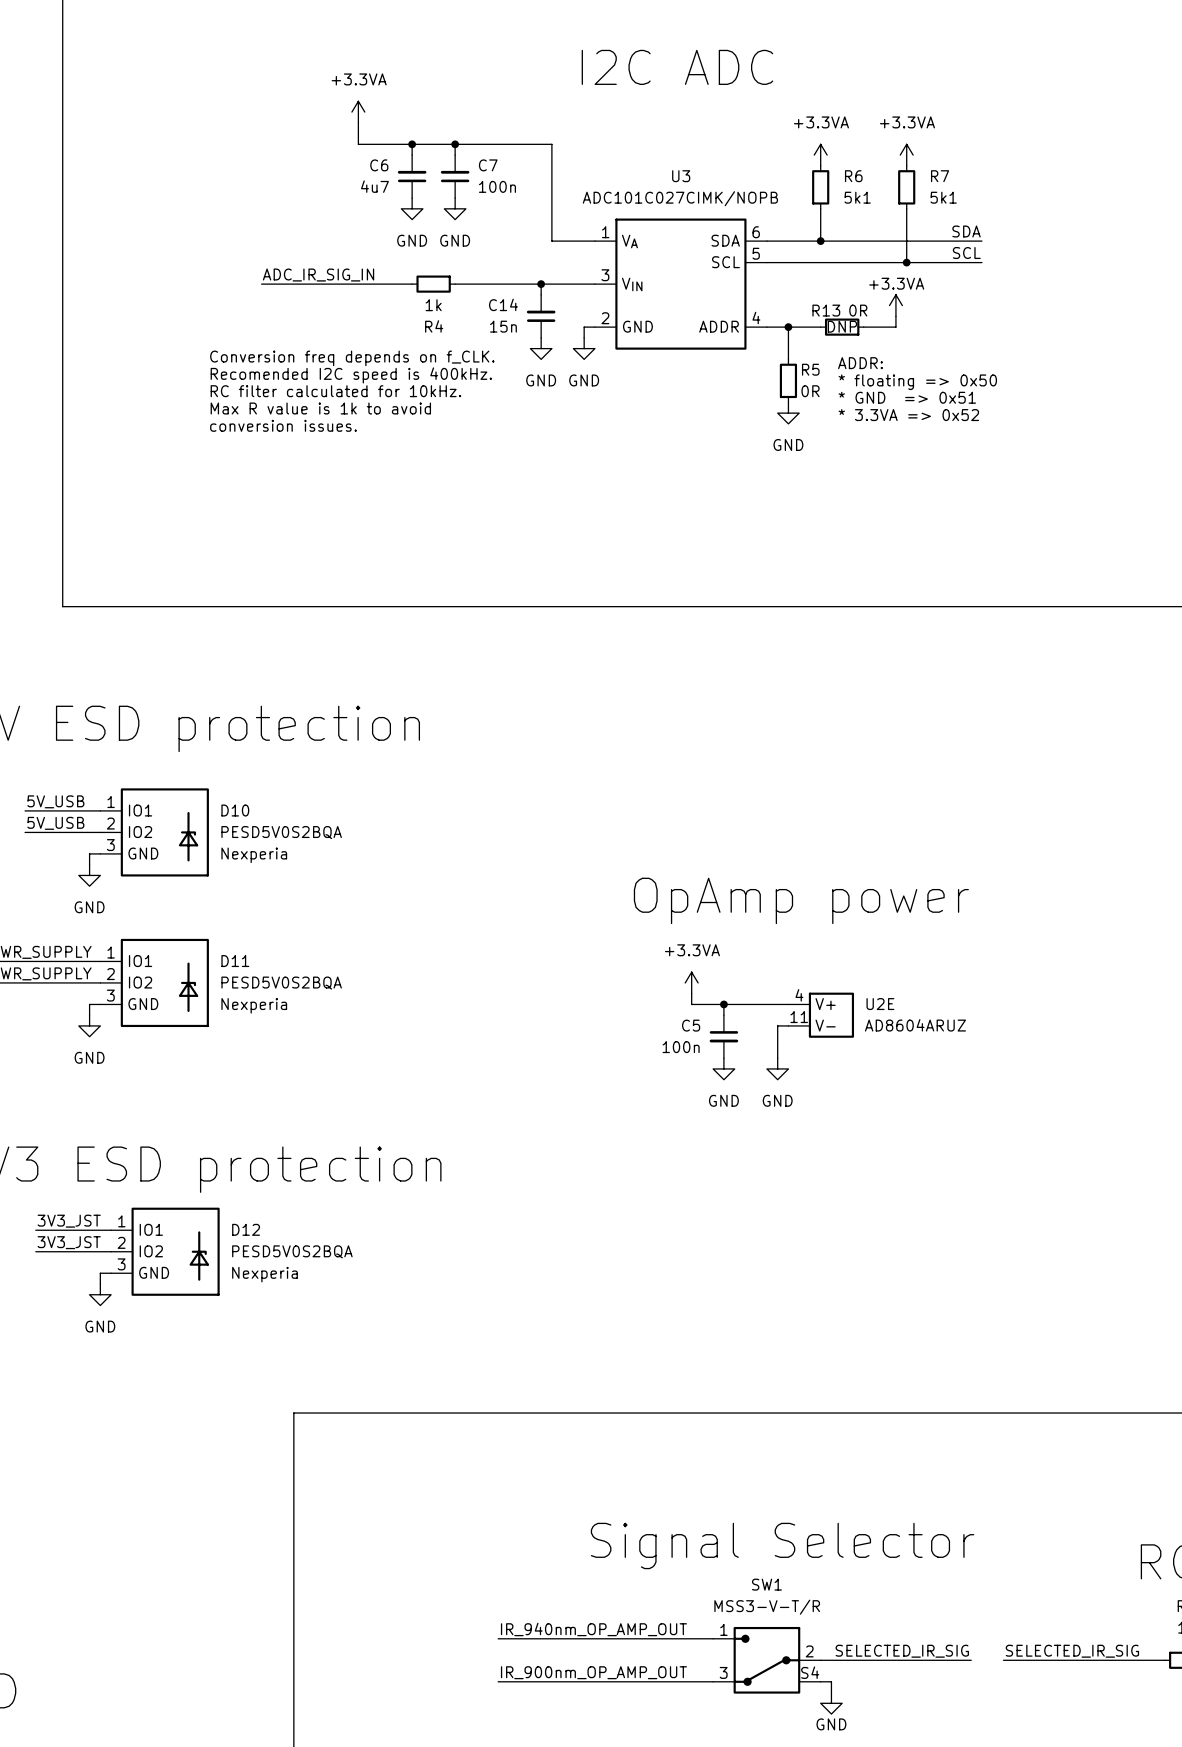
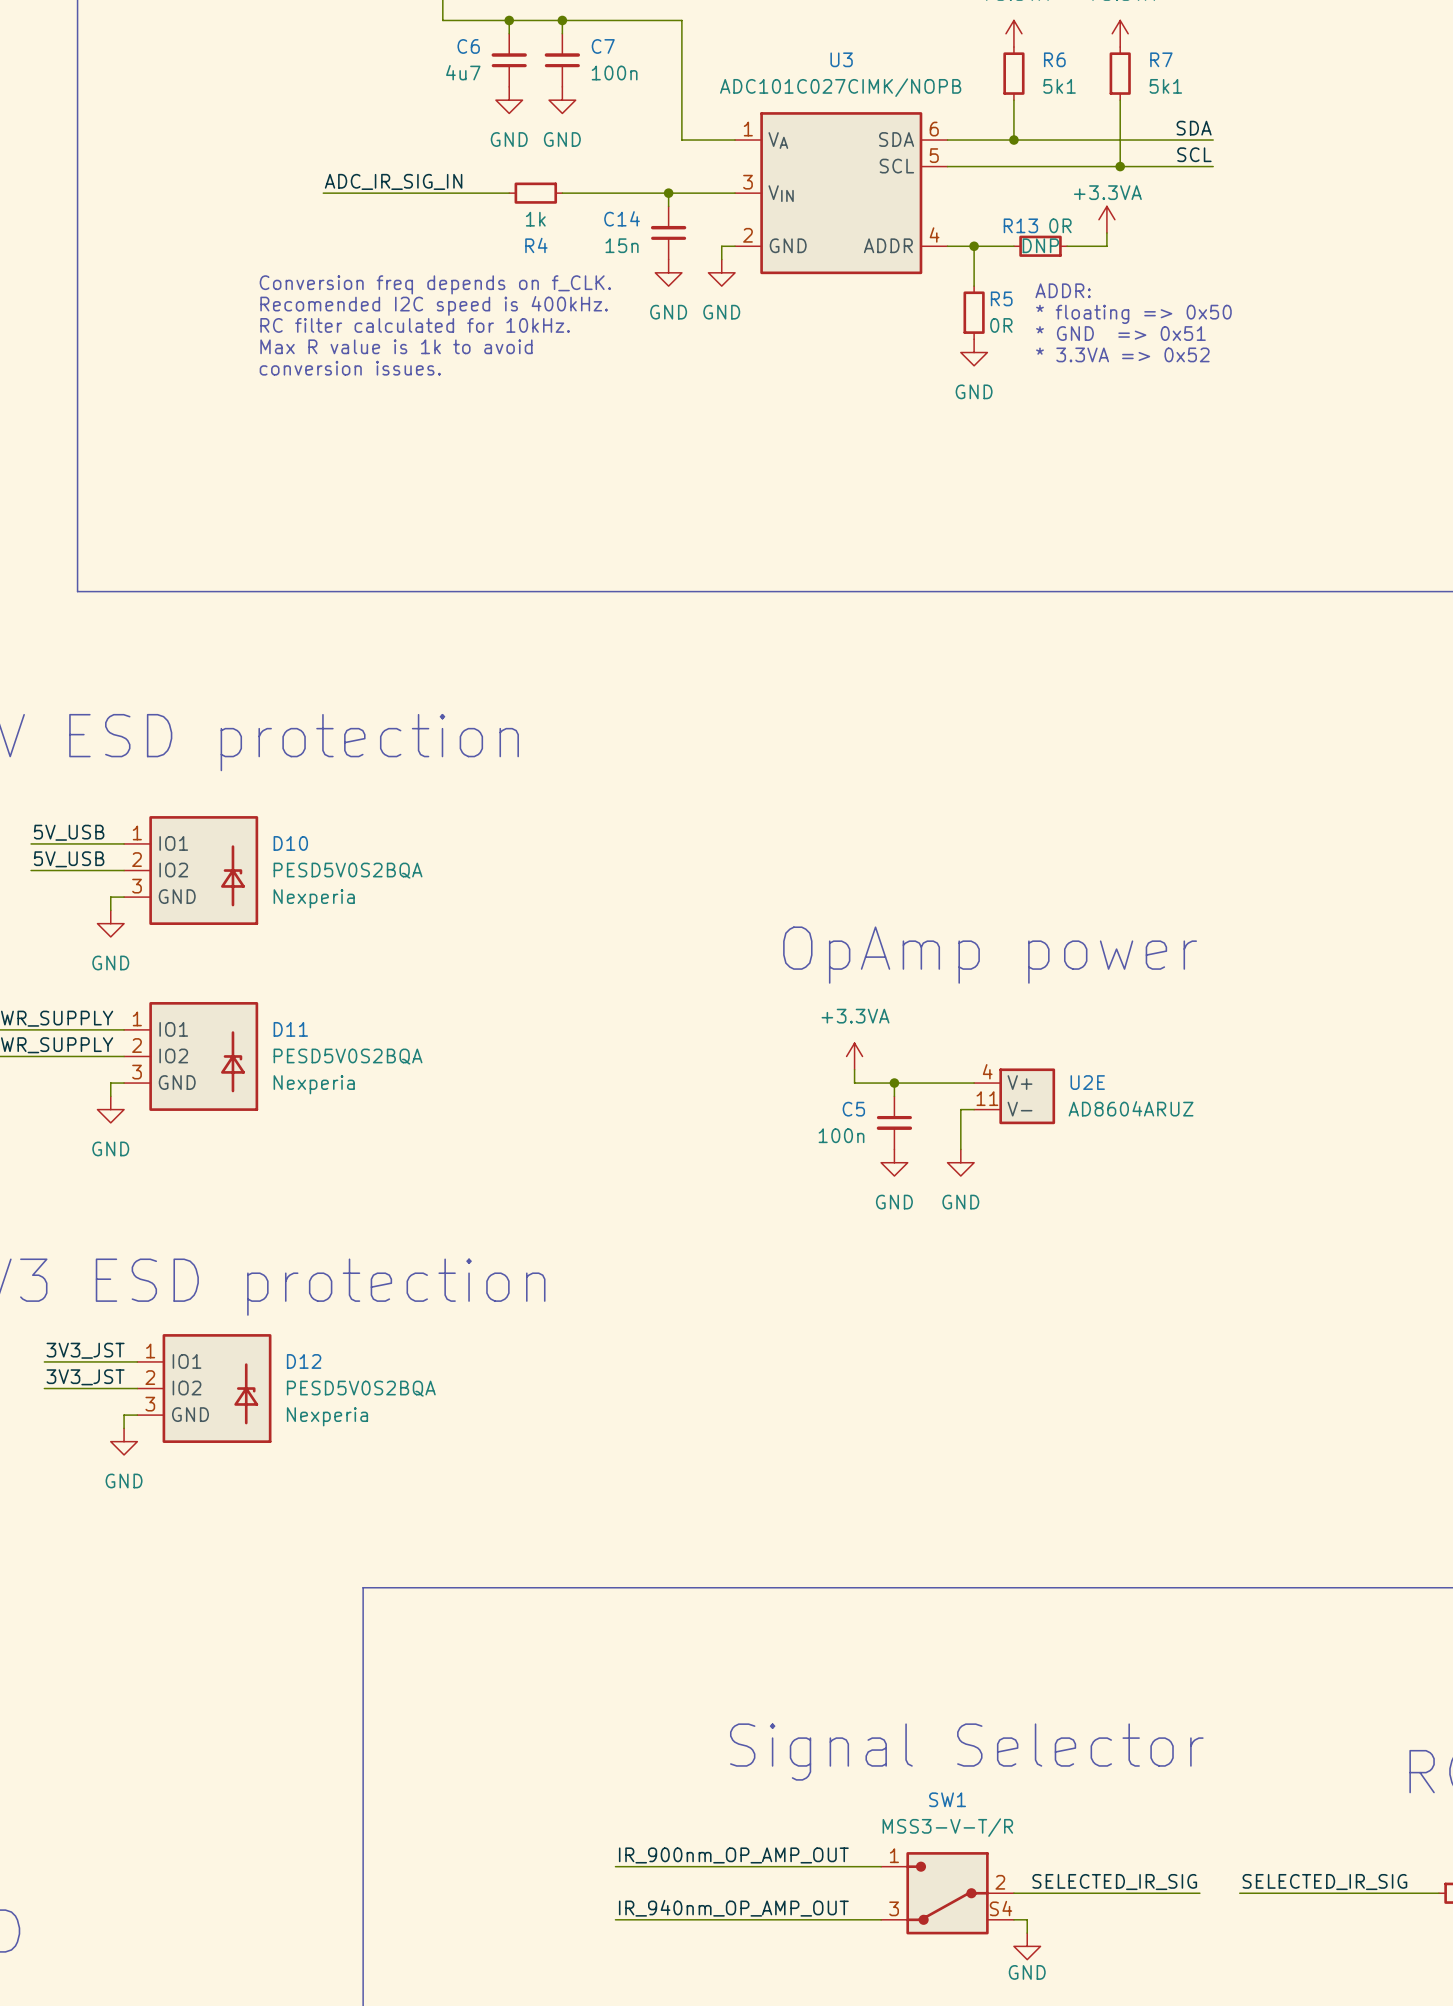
label: IR_940nm_OP_AMP_OUT (593, 1629) -> IR_900nm_OP_AMP_OUT (733, 1855)
label: IR_900nm_OP_AMP_OUT (593, 1672) -> IR_940nm_OP_AMP_OUT (733, 1908)

